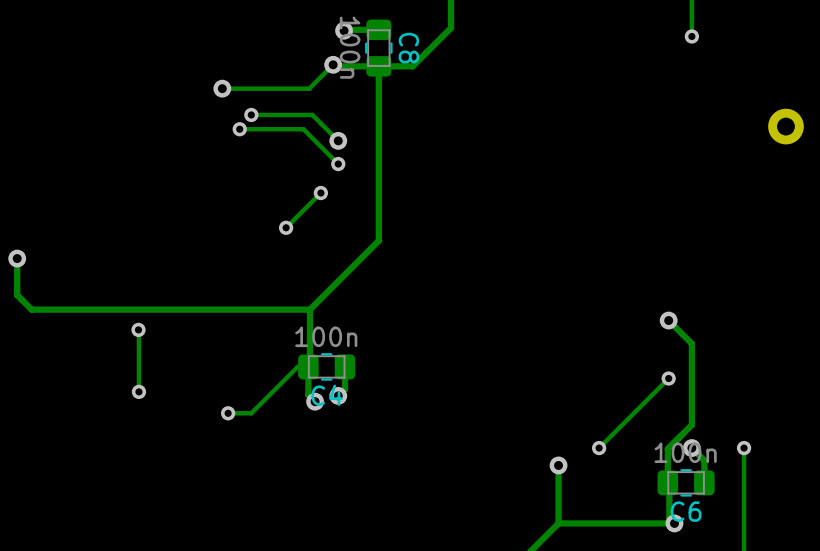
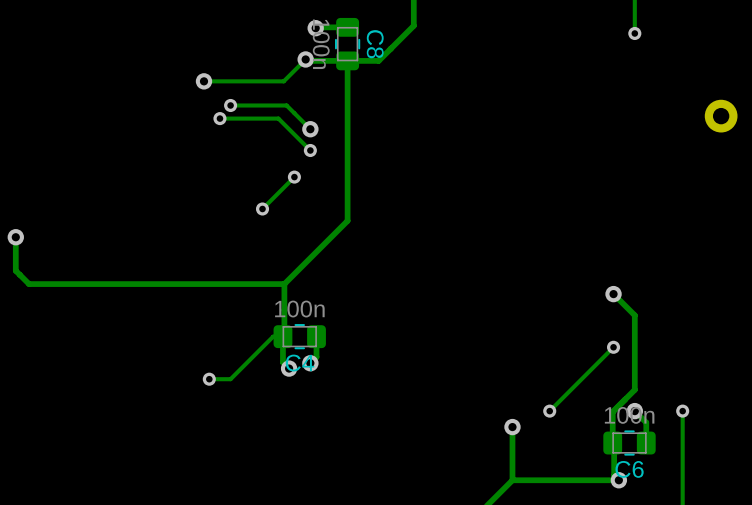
track: (138, 329) (138, 391) -> none
via: (138, 329) -> none
via: (138, 391) -> none

